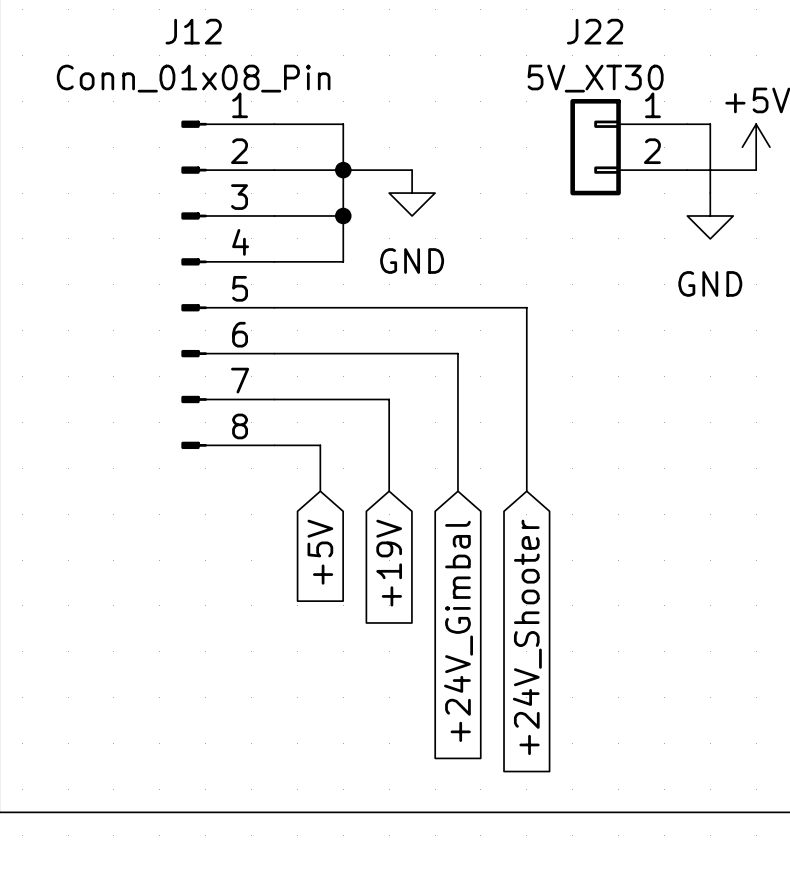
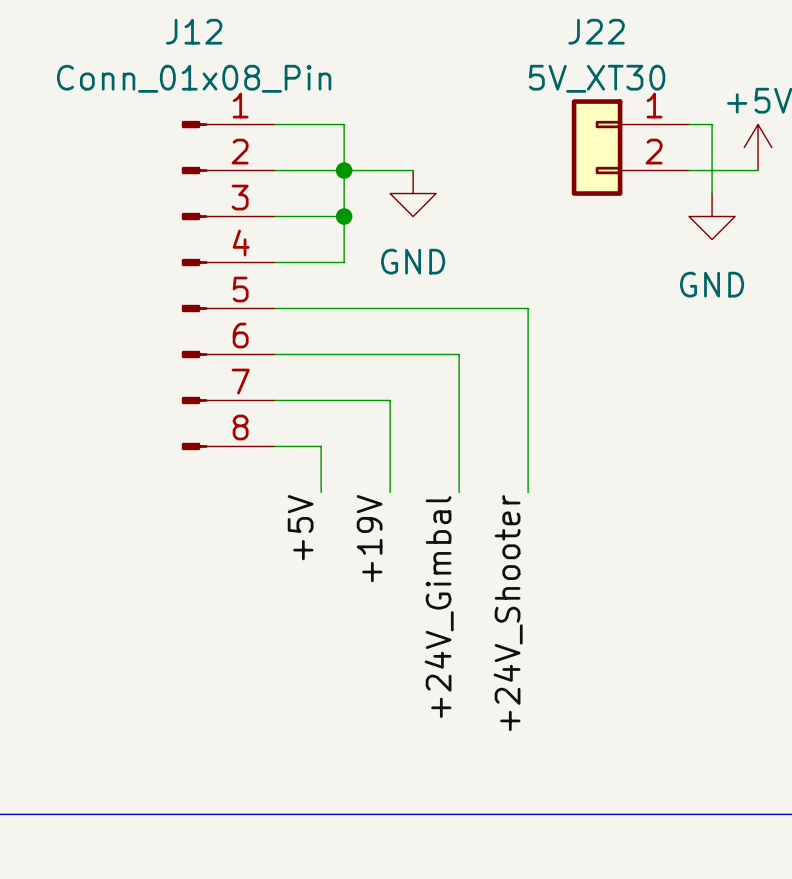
label: none -> +5V (300, 527)
label: none -> +19V (369, 538)
global label: +5V (320, 552) -> none
global label: +19V (389, 563) -> none
label: none -> +24V_Gimbal (439, 607)
label: none -> +24V_Shooter (508, 613)
global label: +24V_Gimbal (458, 631) -> none
global label: +24V_Shooter (527, 637) -> none

